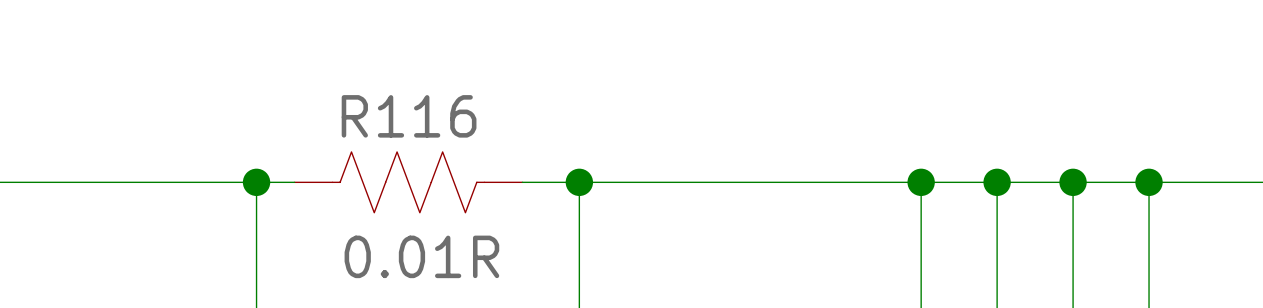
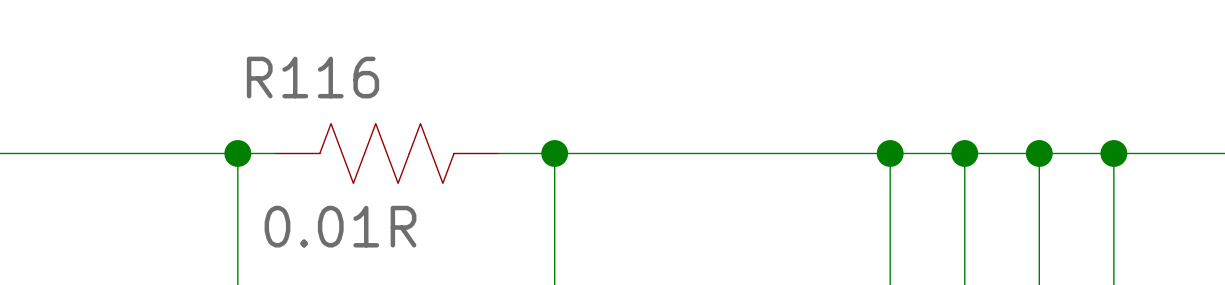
R116 name position: R116 (409, 116) -> R116 (312, 77)
R116 value position: 0.01R (421, 256) -> 0.01R (340, 226)

